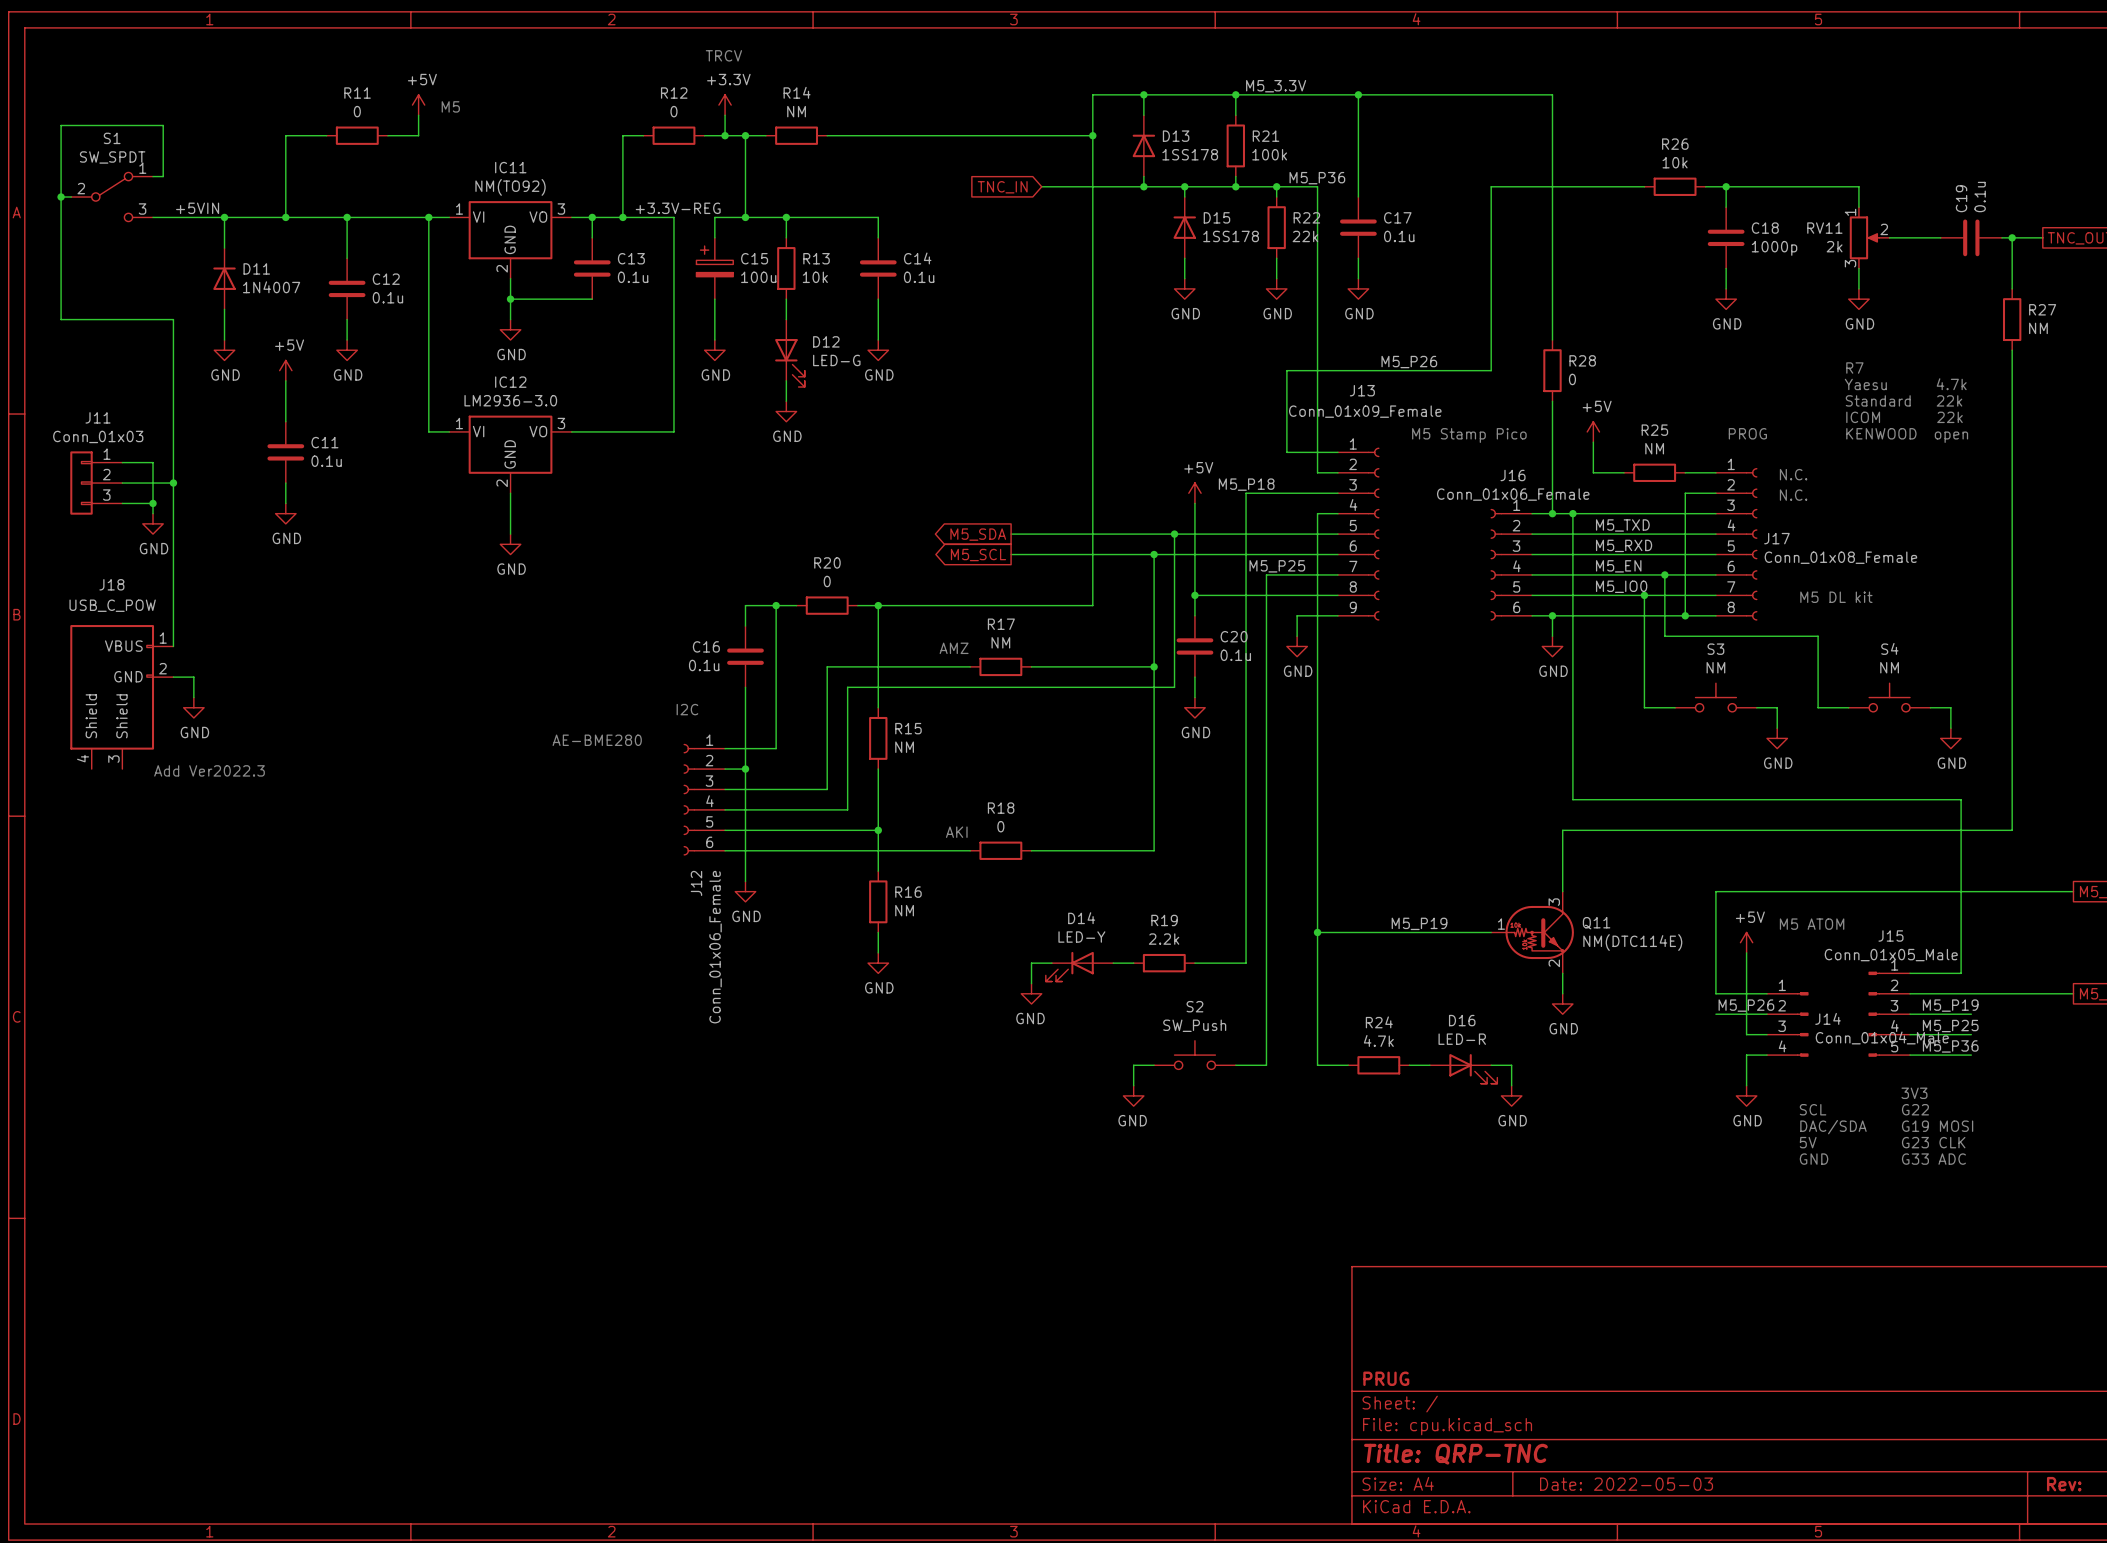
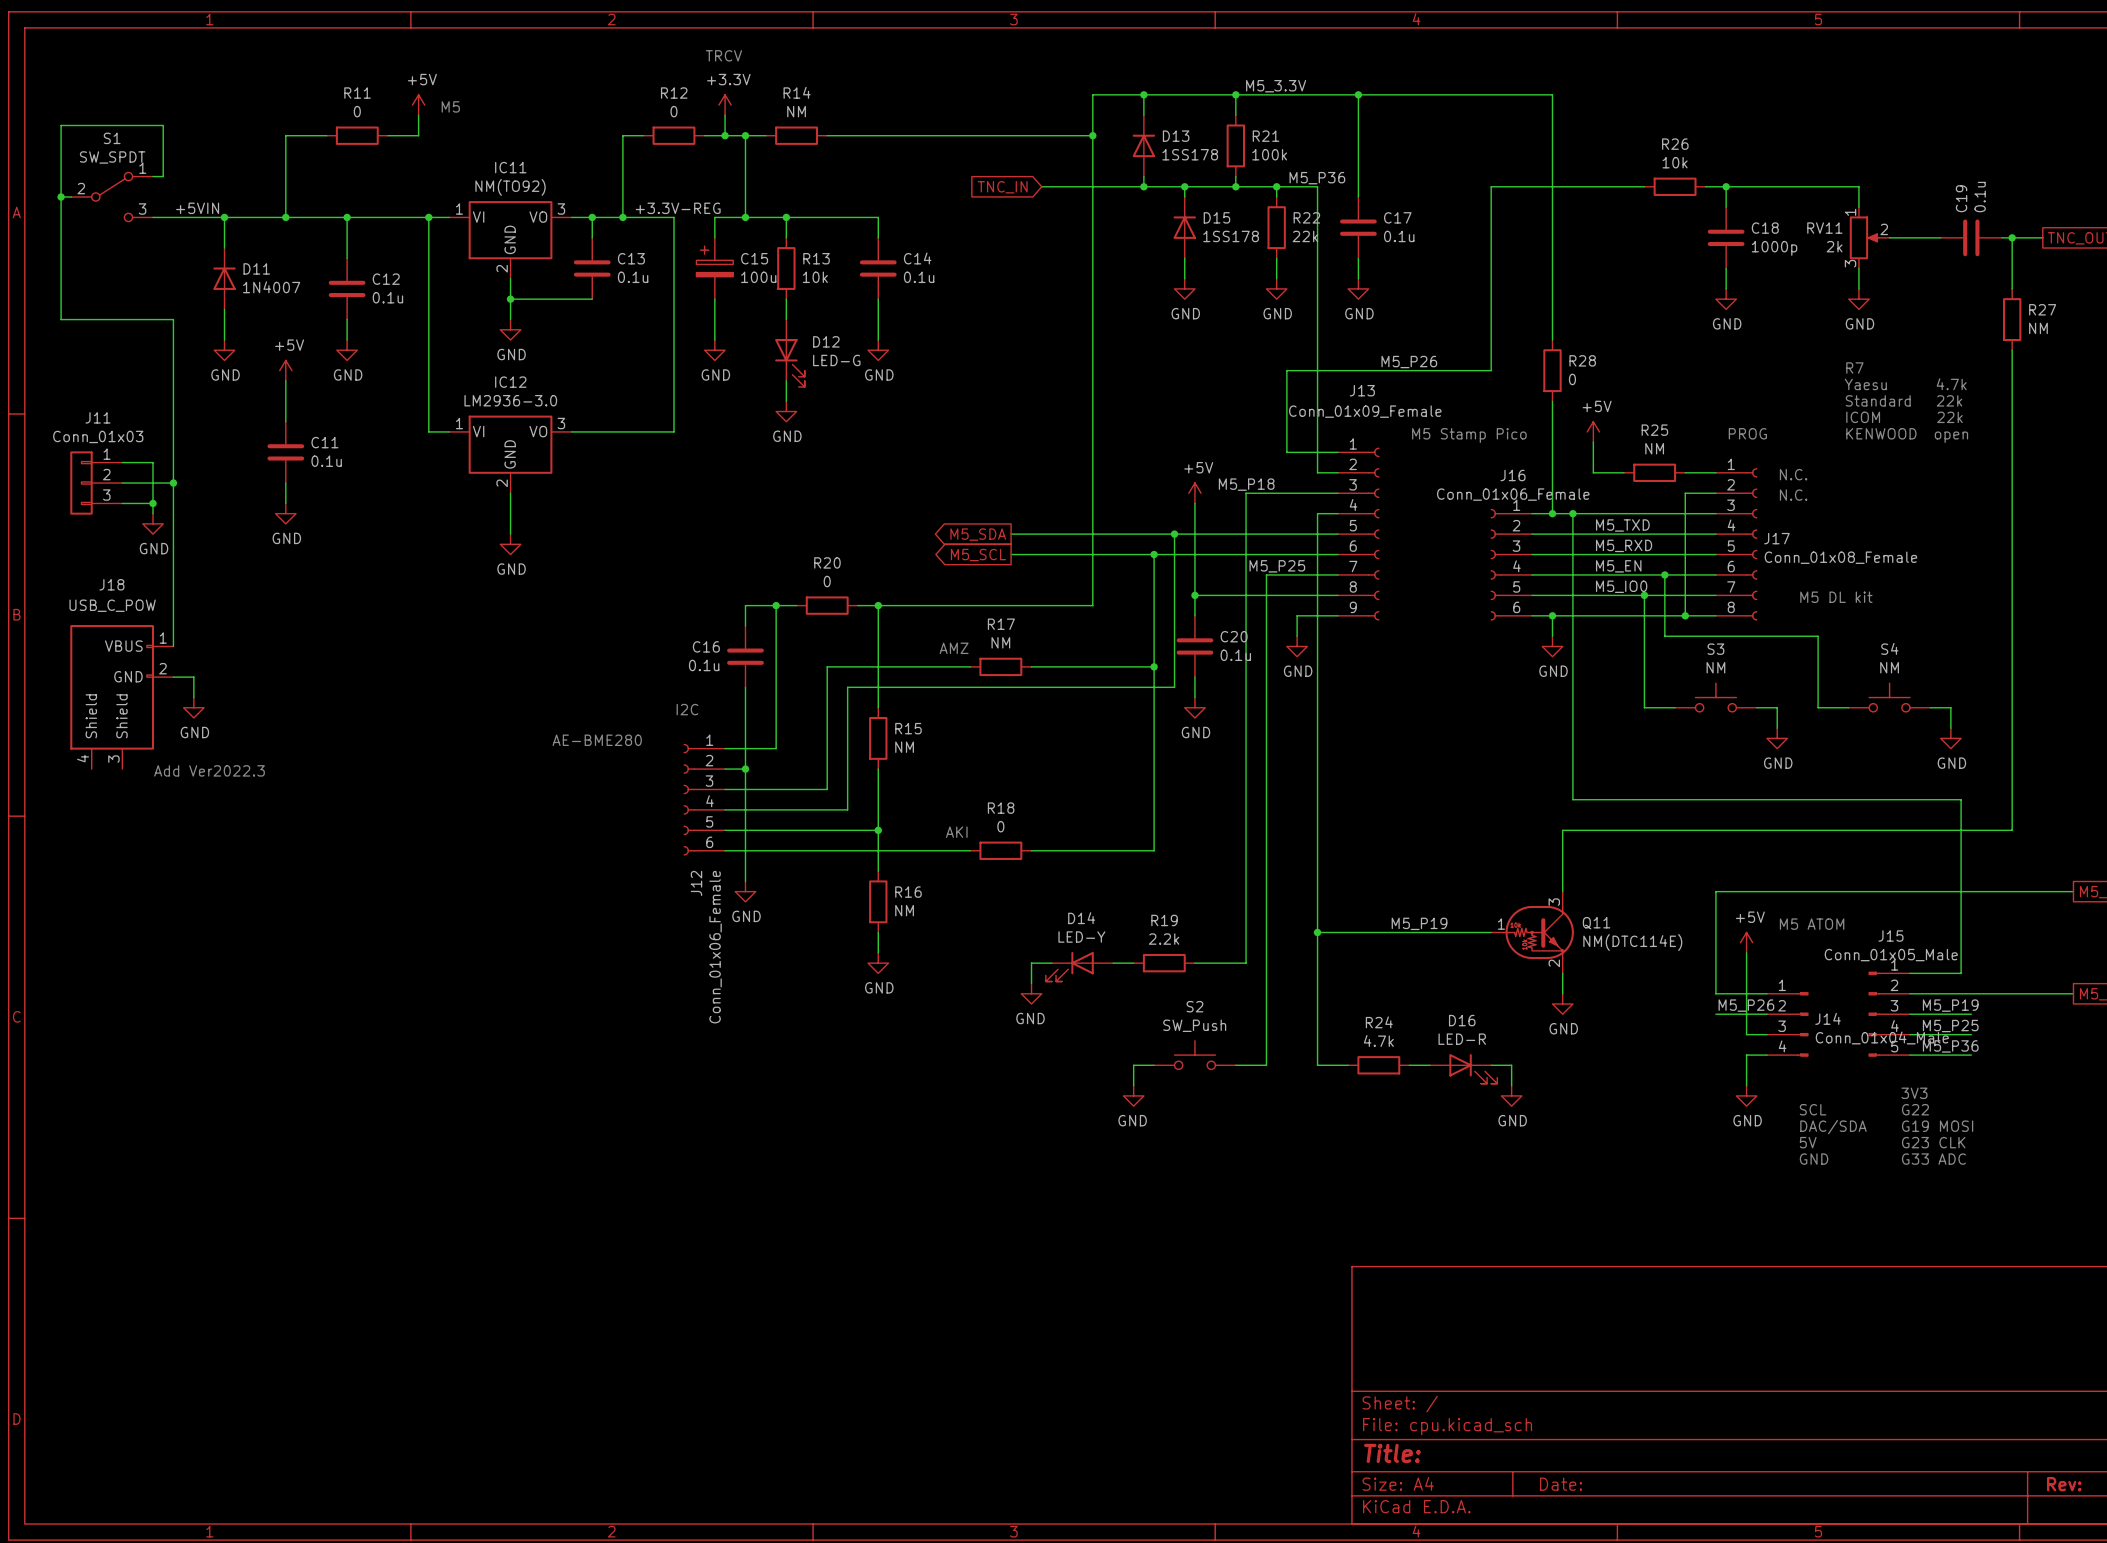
title block: PRUG (1386, 1378) -> none
title block: Title: QRP-TNC (1455, 1454) -> Title: (1392, 1453)
title block: Date: 2022-05-03 (1626, 1484) -> Date: (1561, 1484)

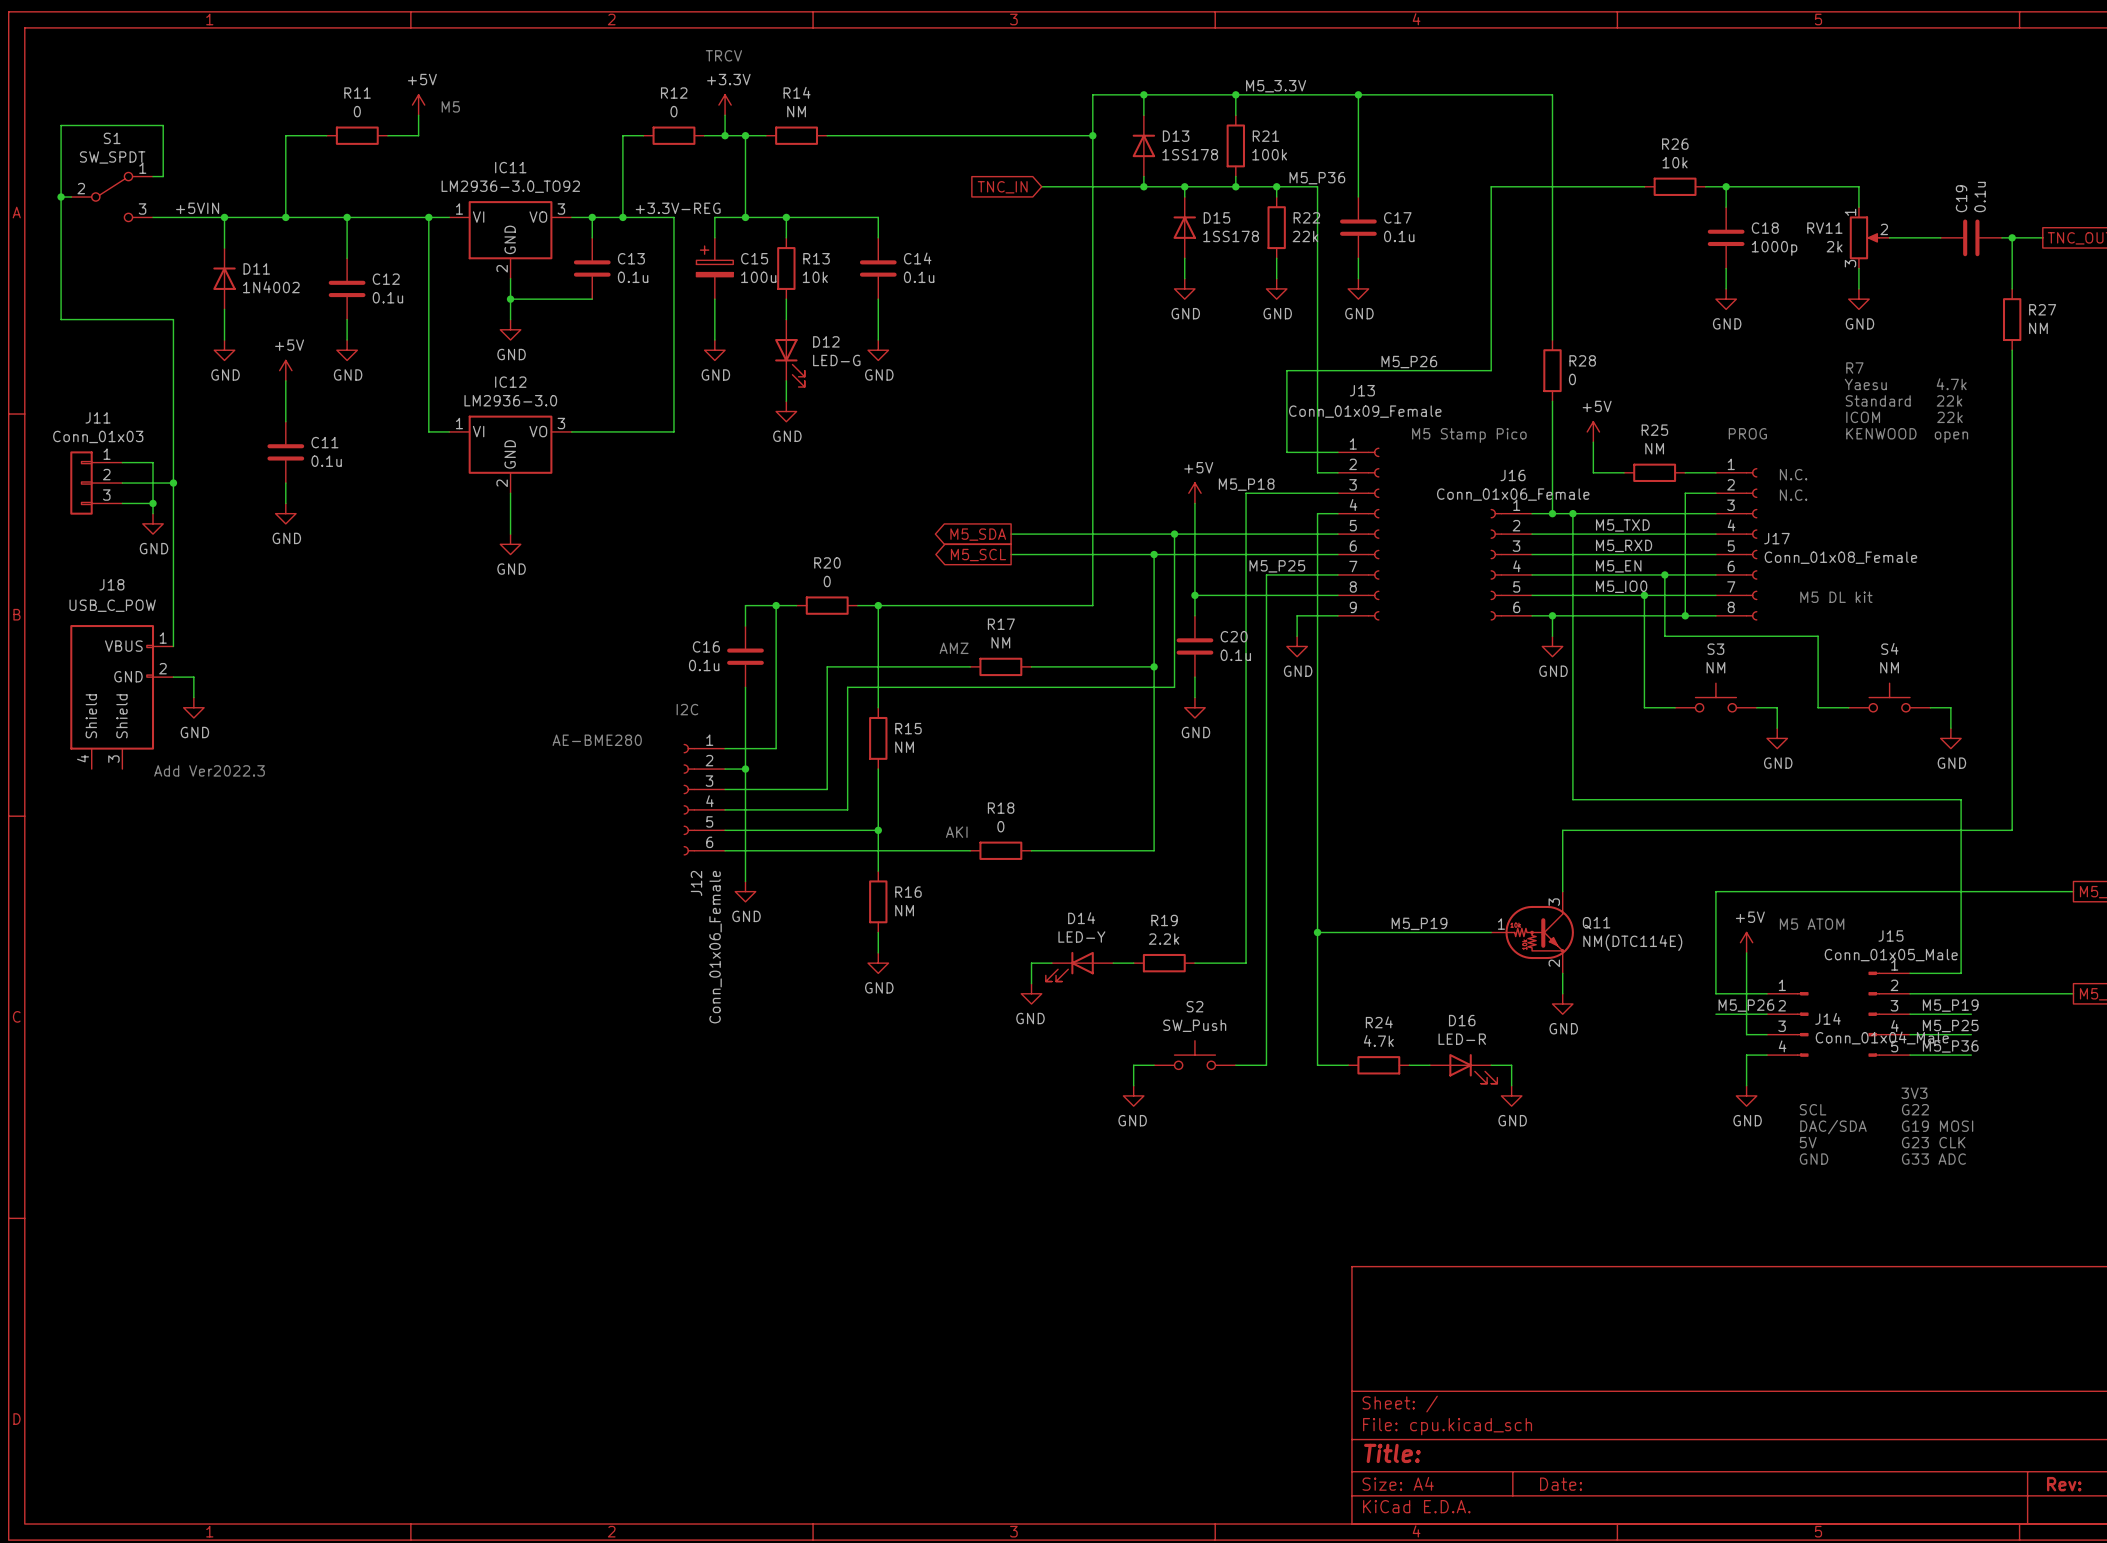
IC11 value: NM(TO92) (510, 187) -> LM2936-3.0_TO92 (510, 186)
D11 value: 1N4007 (271, 287) -> 1N4002 (271, 287)

